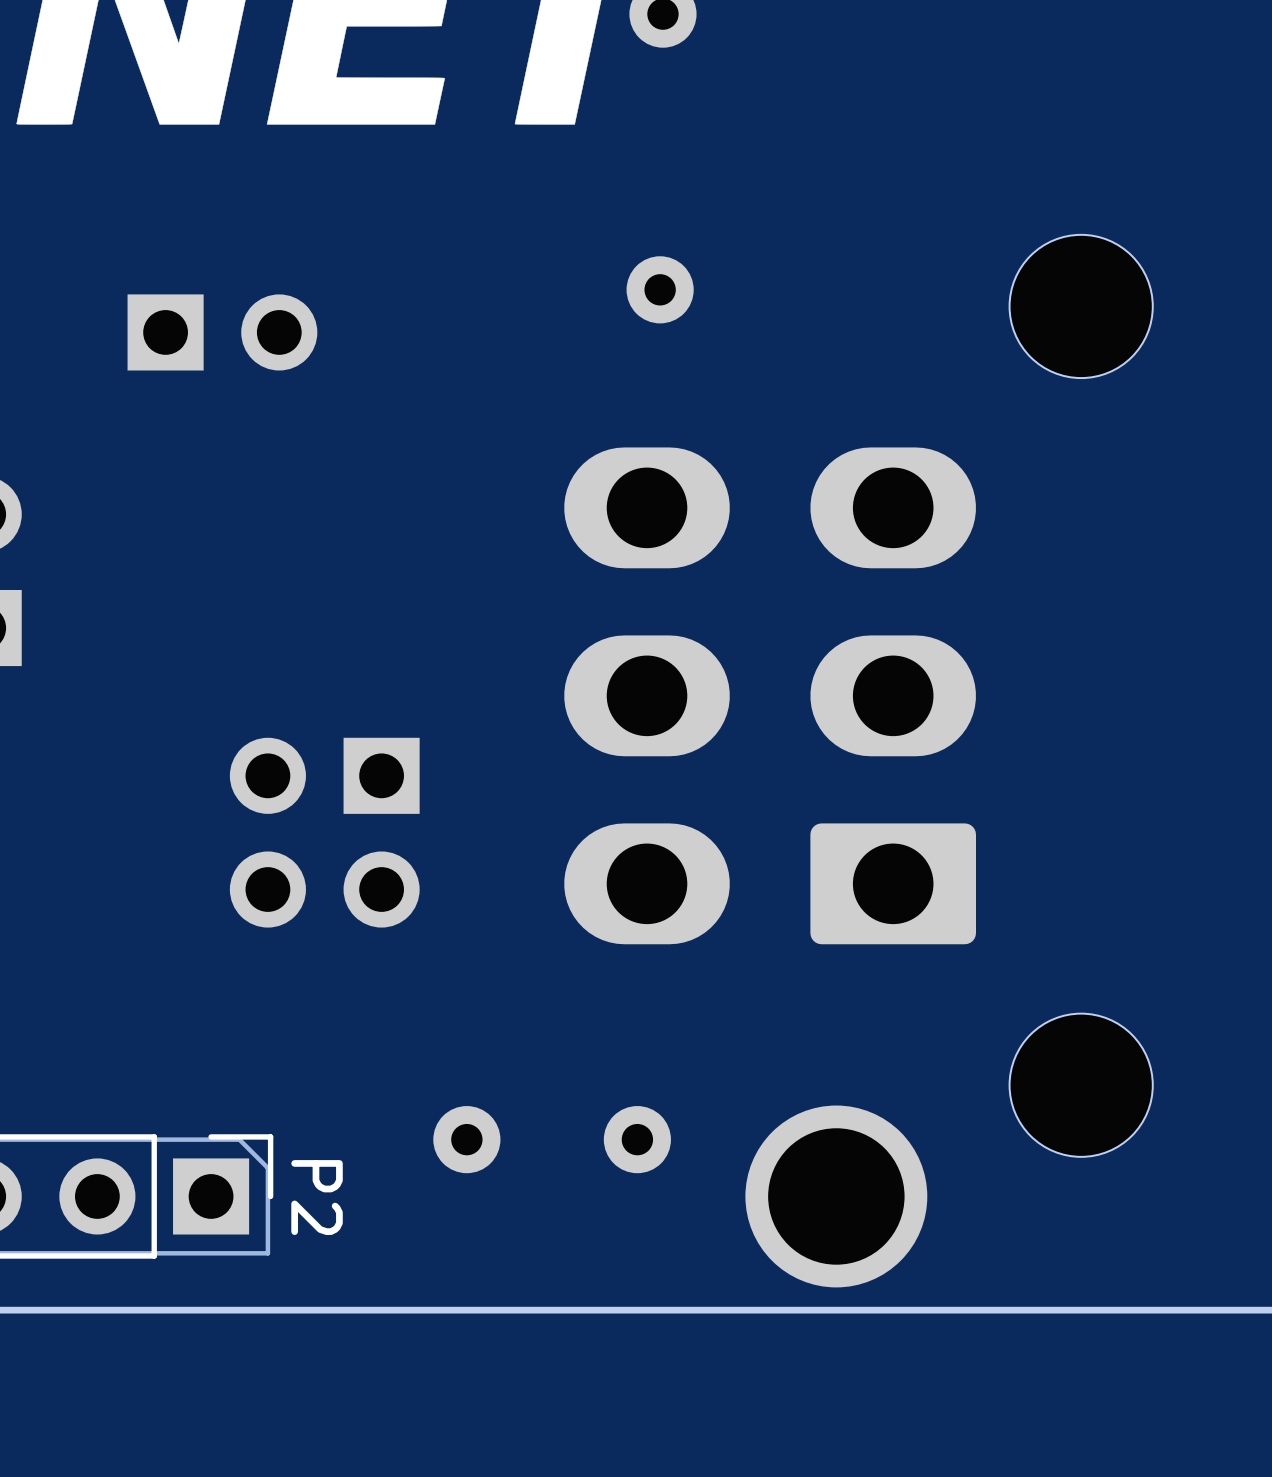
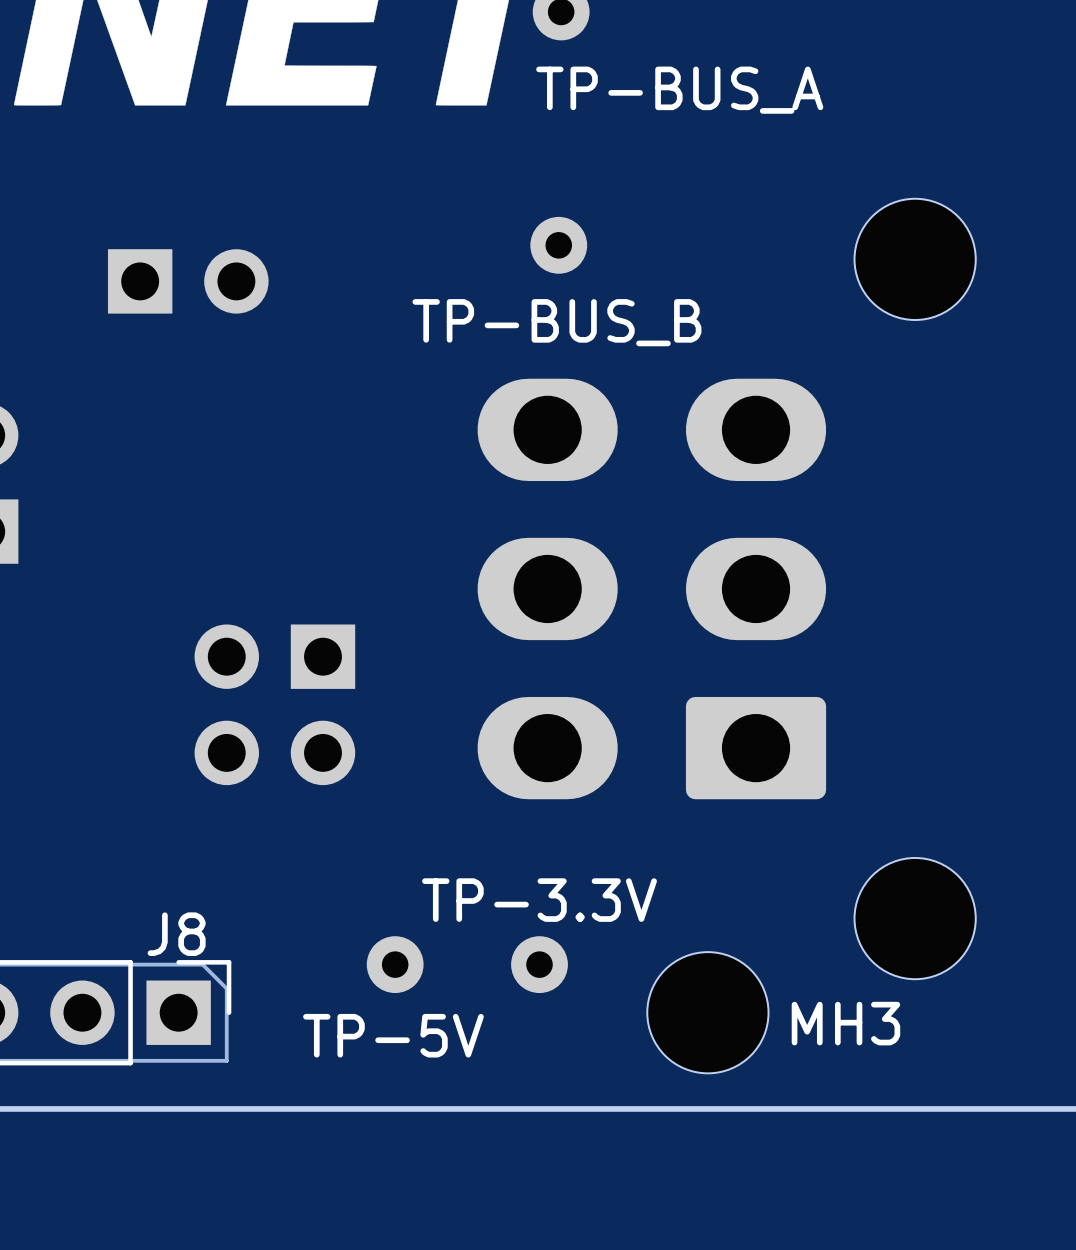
part text: none -> TP-BUS_A (679, 90)
part text: none -> TP-BUS_B (556, 322)
part text: none -> TP-3.3V (539, 900)
part: (836, 1196) -> none
MH3: none -> (707, 1012)
P2 name: P2 (317, 1197) -> J8 (176, 934)
part text: none -> TP-5V (393, 1035)

